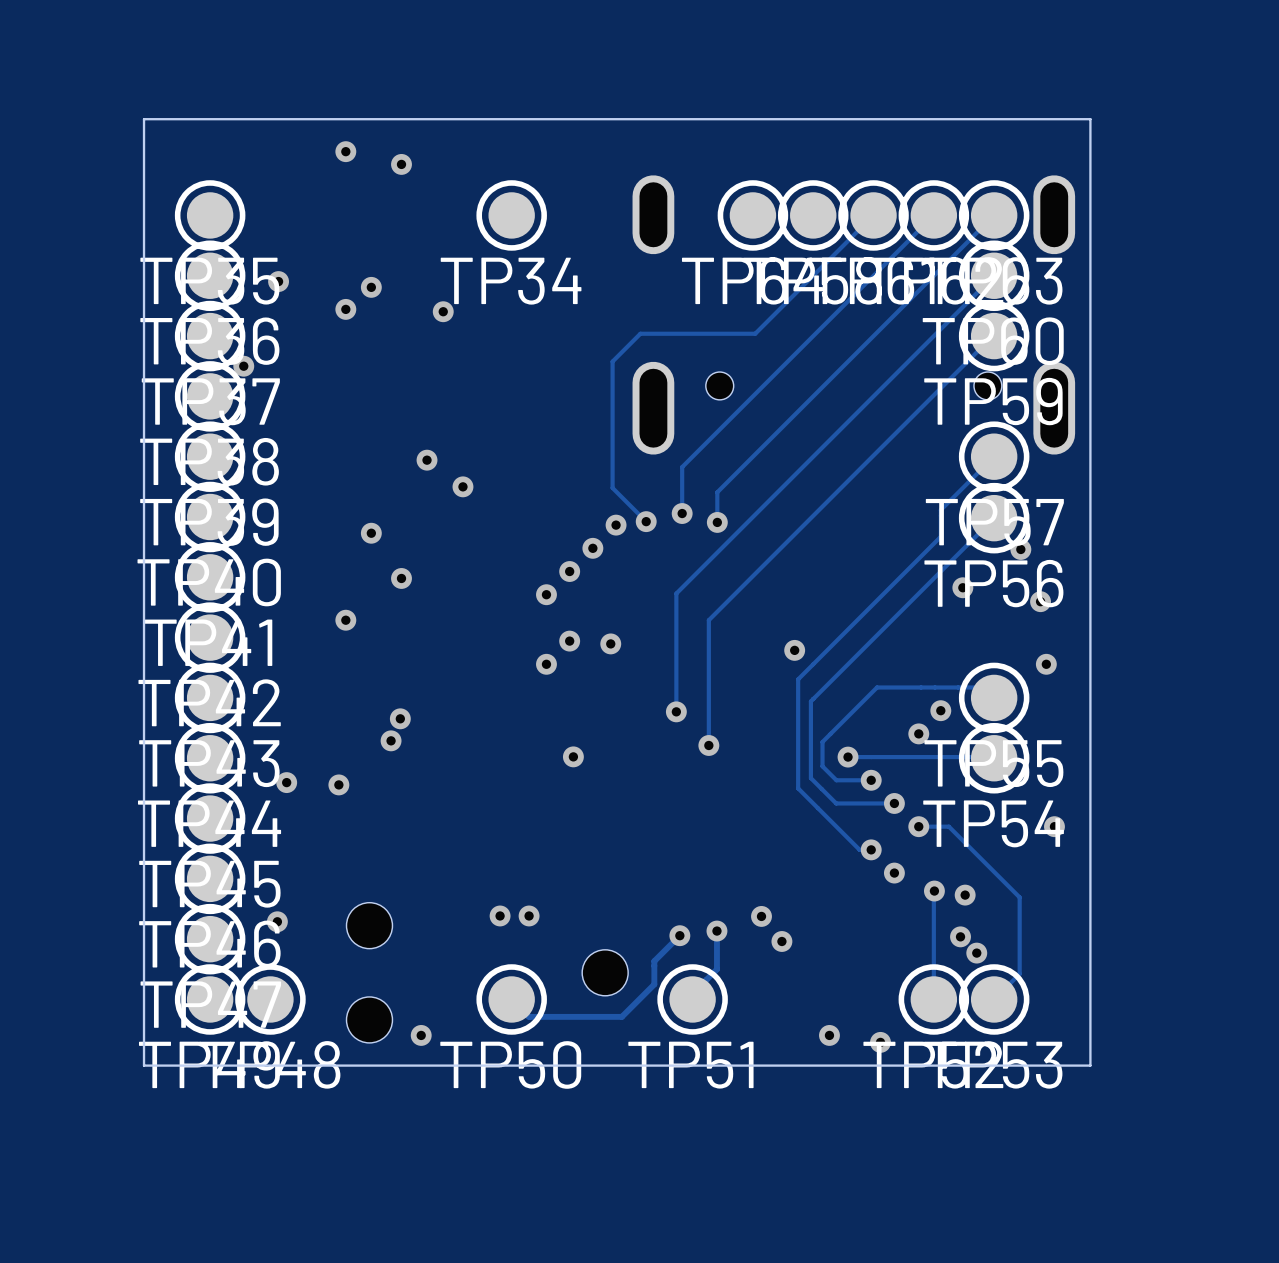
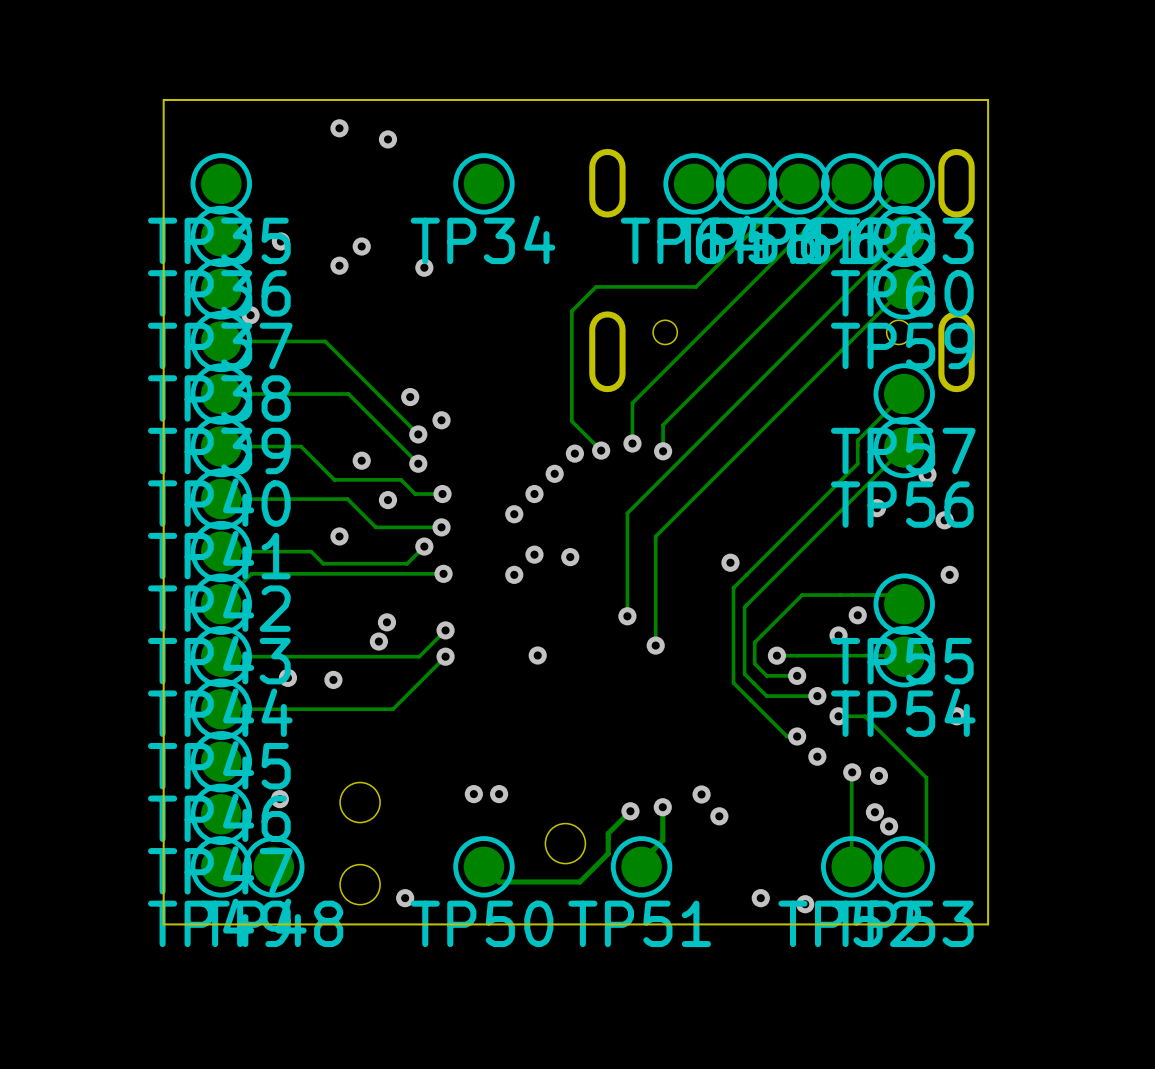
track: none -> (221, 341) (325, 341) (418, 434)
track: none -> (221, 394) (348, 394) (418, 463)
via: none -> (418, 434)
track: none -> (221, 446) (301, 446) (334, 479) (401, 479) (415, 494) (442, 494)
via: none -> (418, 463)
via: none -> (442, 494)
track: none -> (221, 499) (347, 499) (375, 527) (441, 527)
via: none -> (441, 527)
track: none -> (424, 546) (407, 563) (323, 563) (311, 551) (221, 551) (233, 563)
via: none -> (424, 546)
track: none -> (443, 573) (251, 573) (221, 604)
via: none -> (443, 573)
track: none -> (445, 630) (419, 656) (221, 656)
via: none -> (445, 630)
track: none -> (445, 656) (393, 709) (221, 709)
via: none -> (445, 656)

